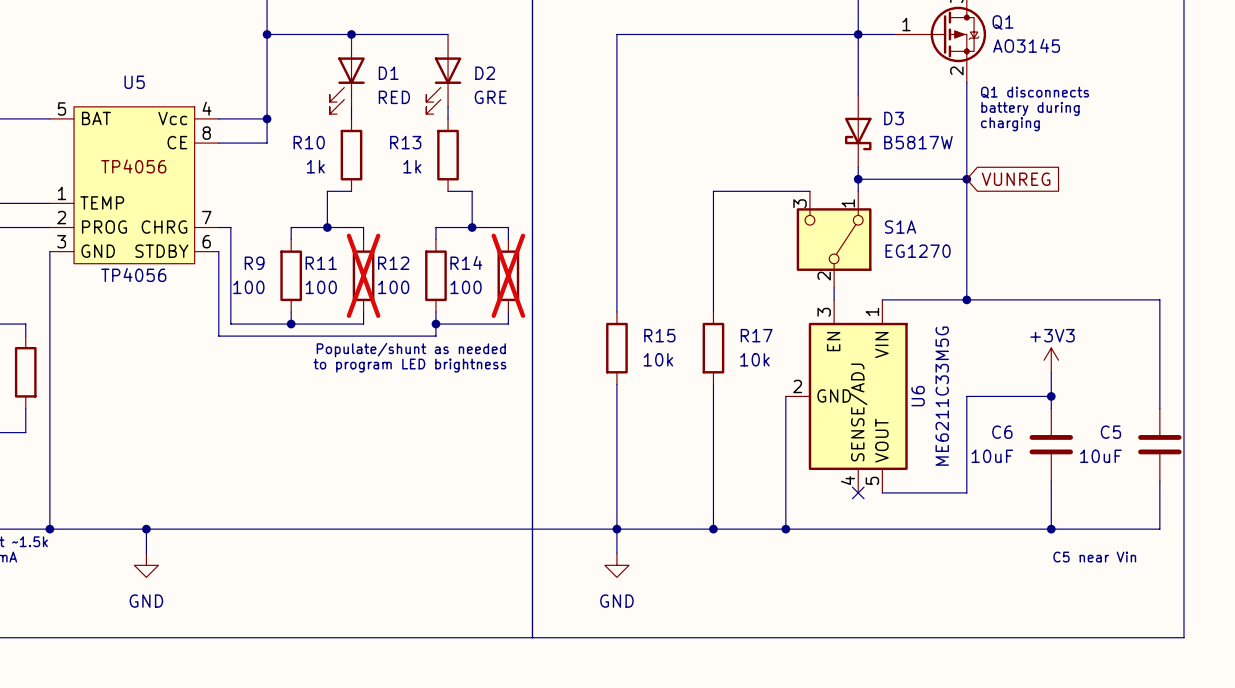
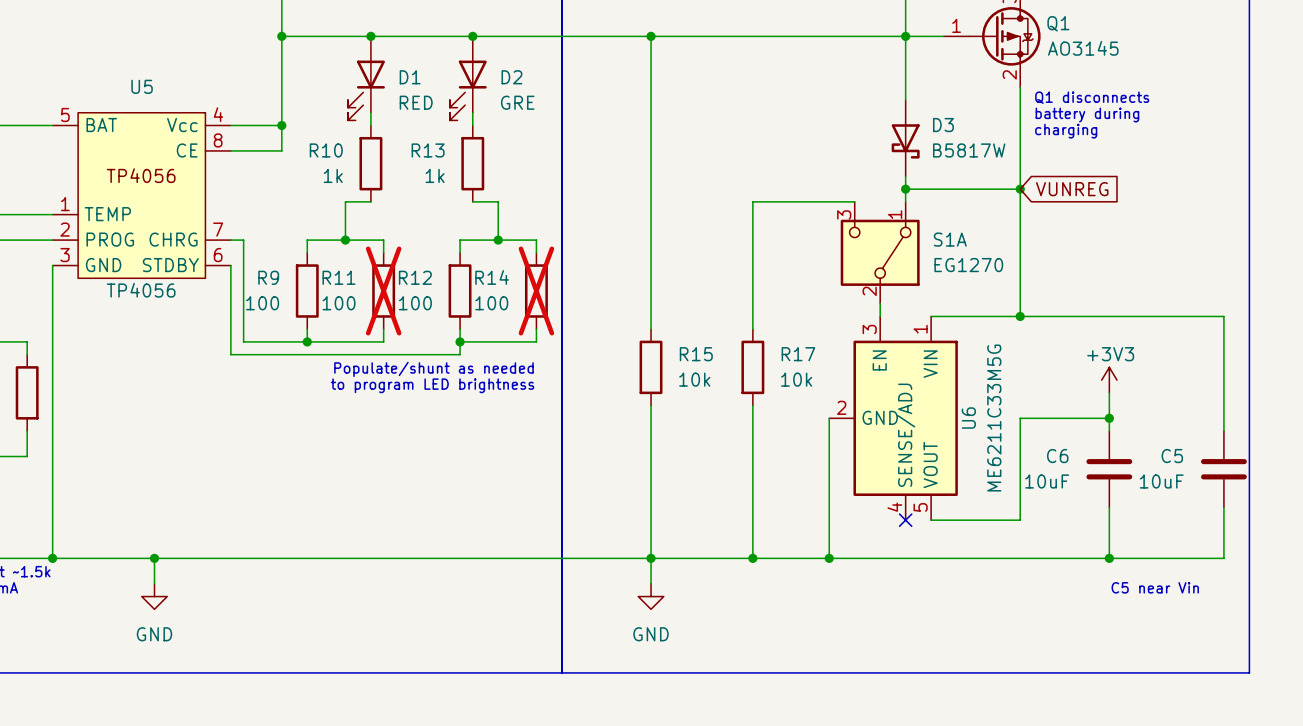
wire: none -> (472, 36) (651, 36)
junction: none -> (472, 36)
junction: none -> (651, 36)

